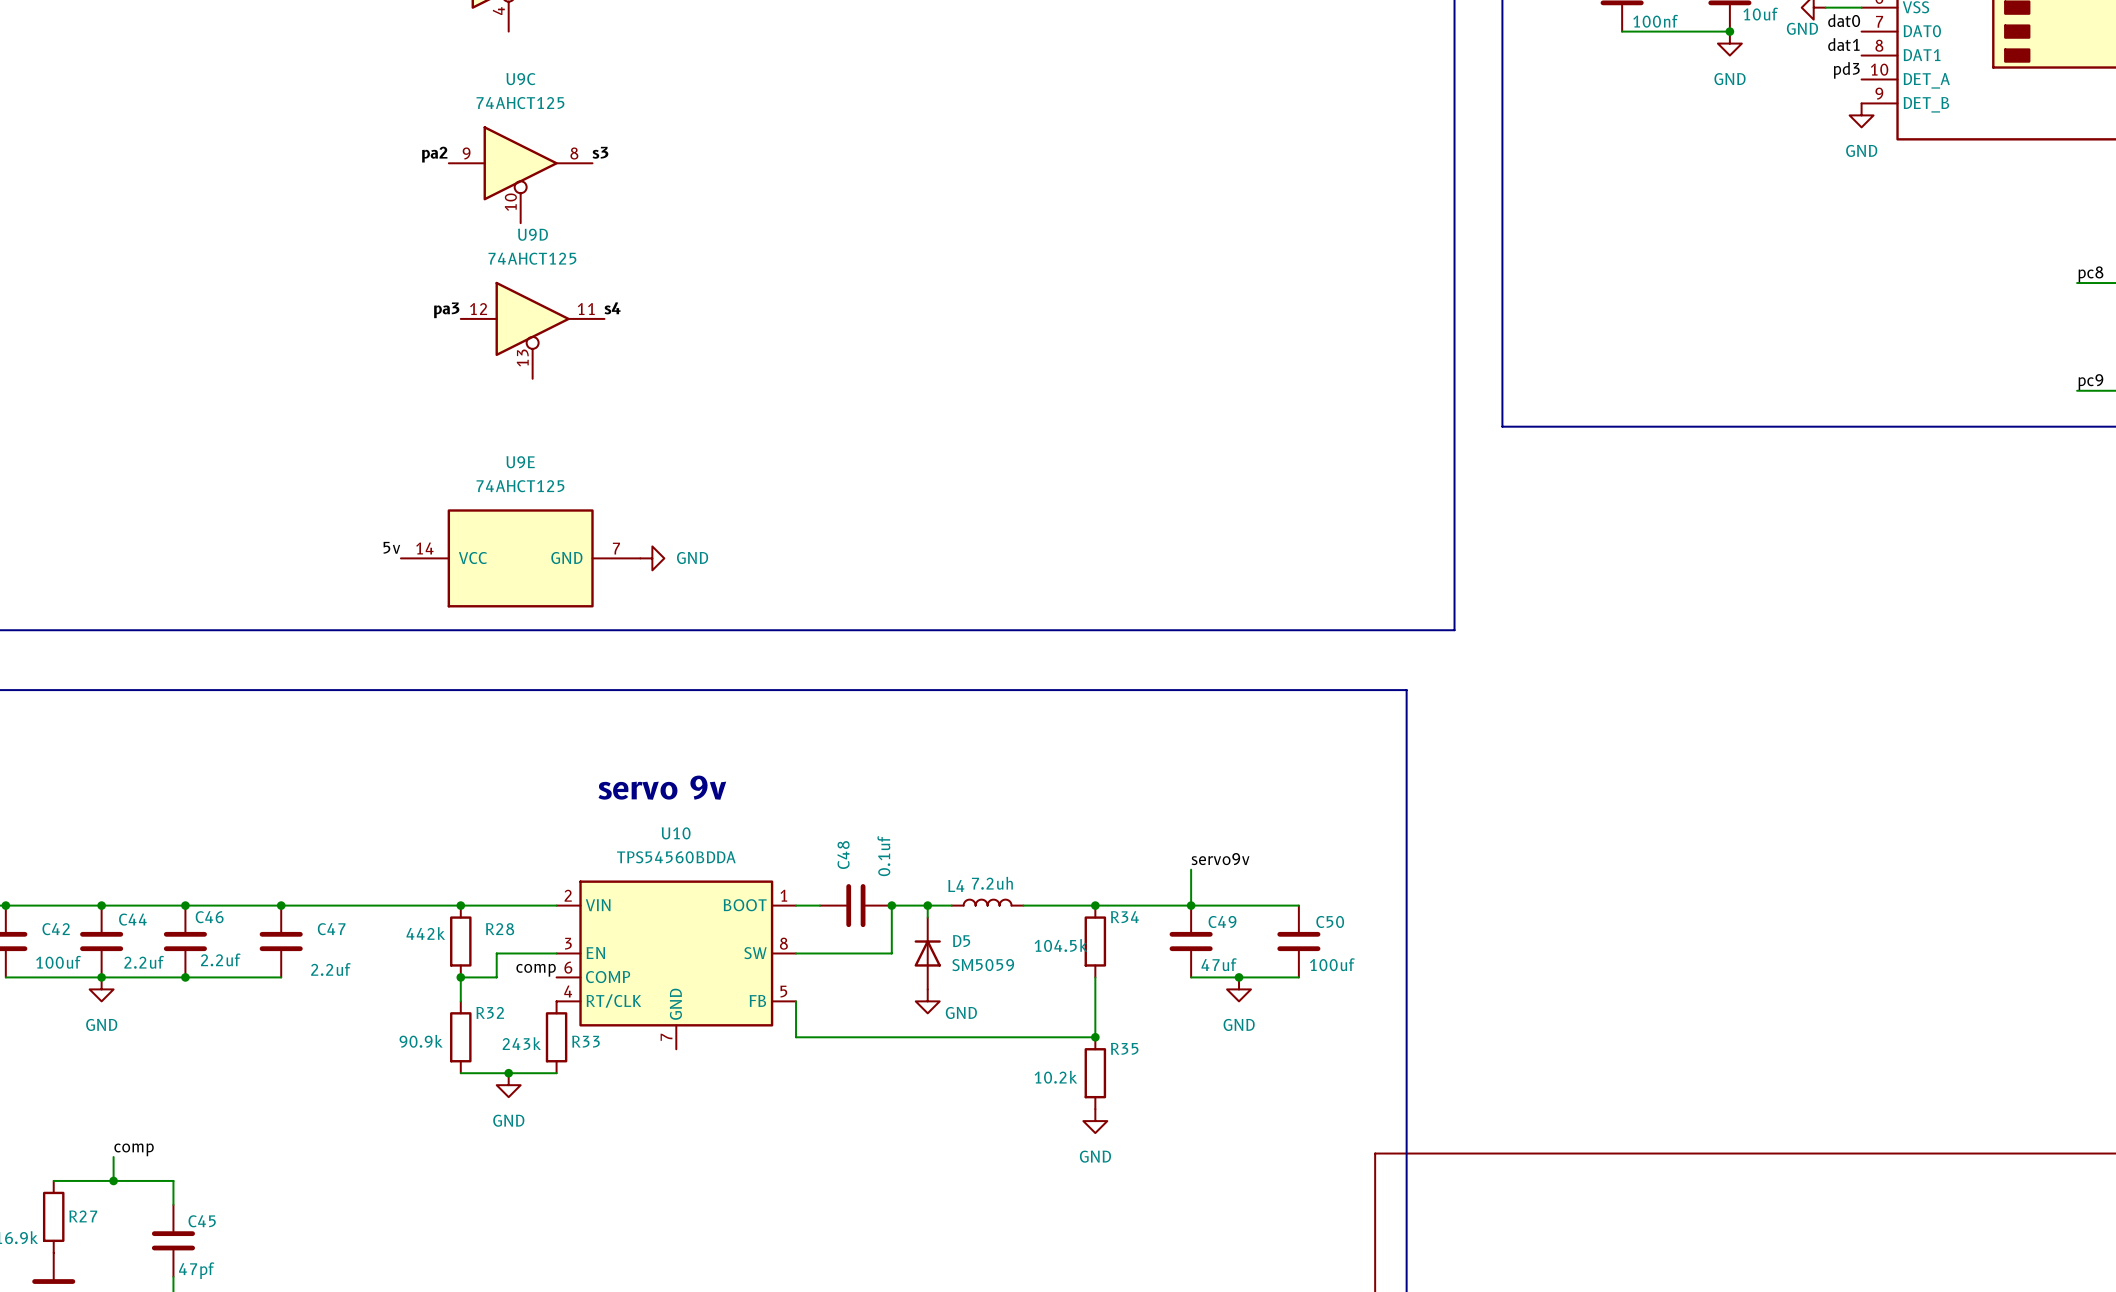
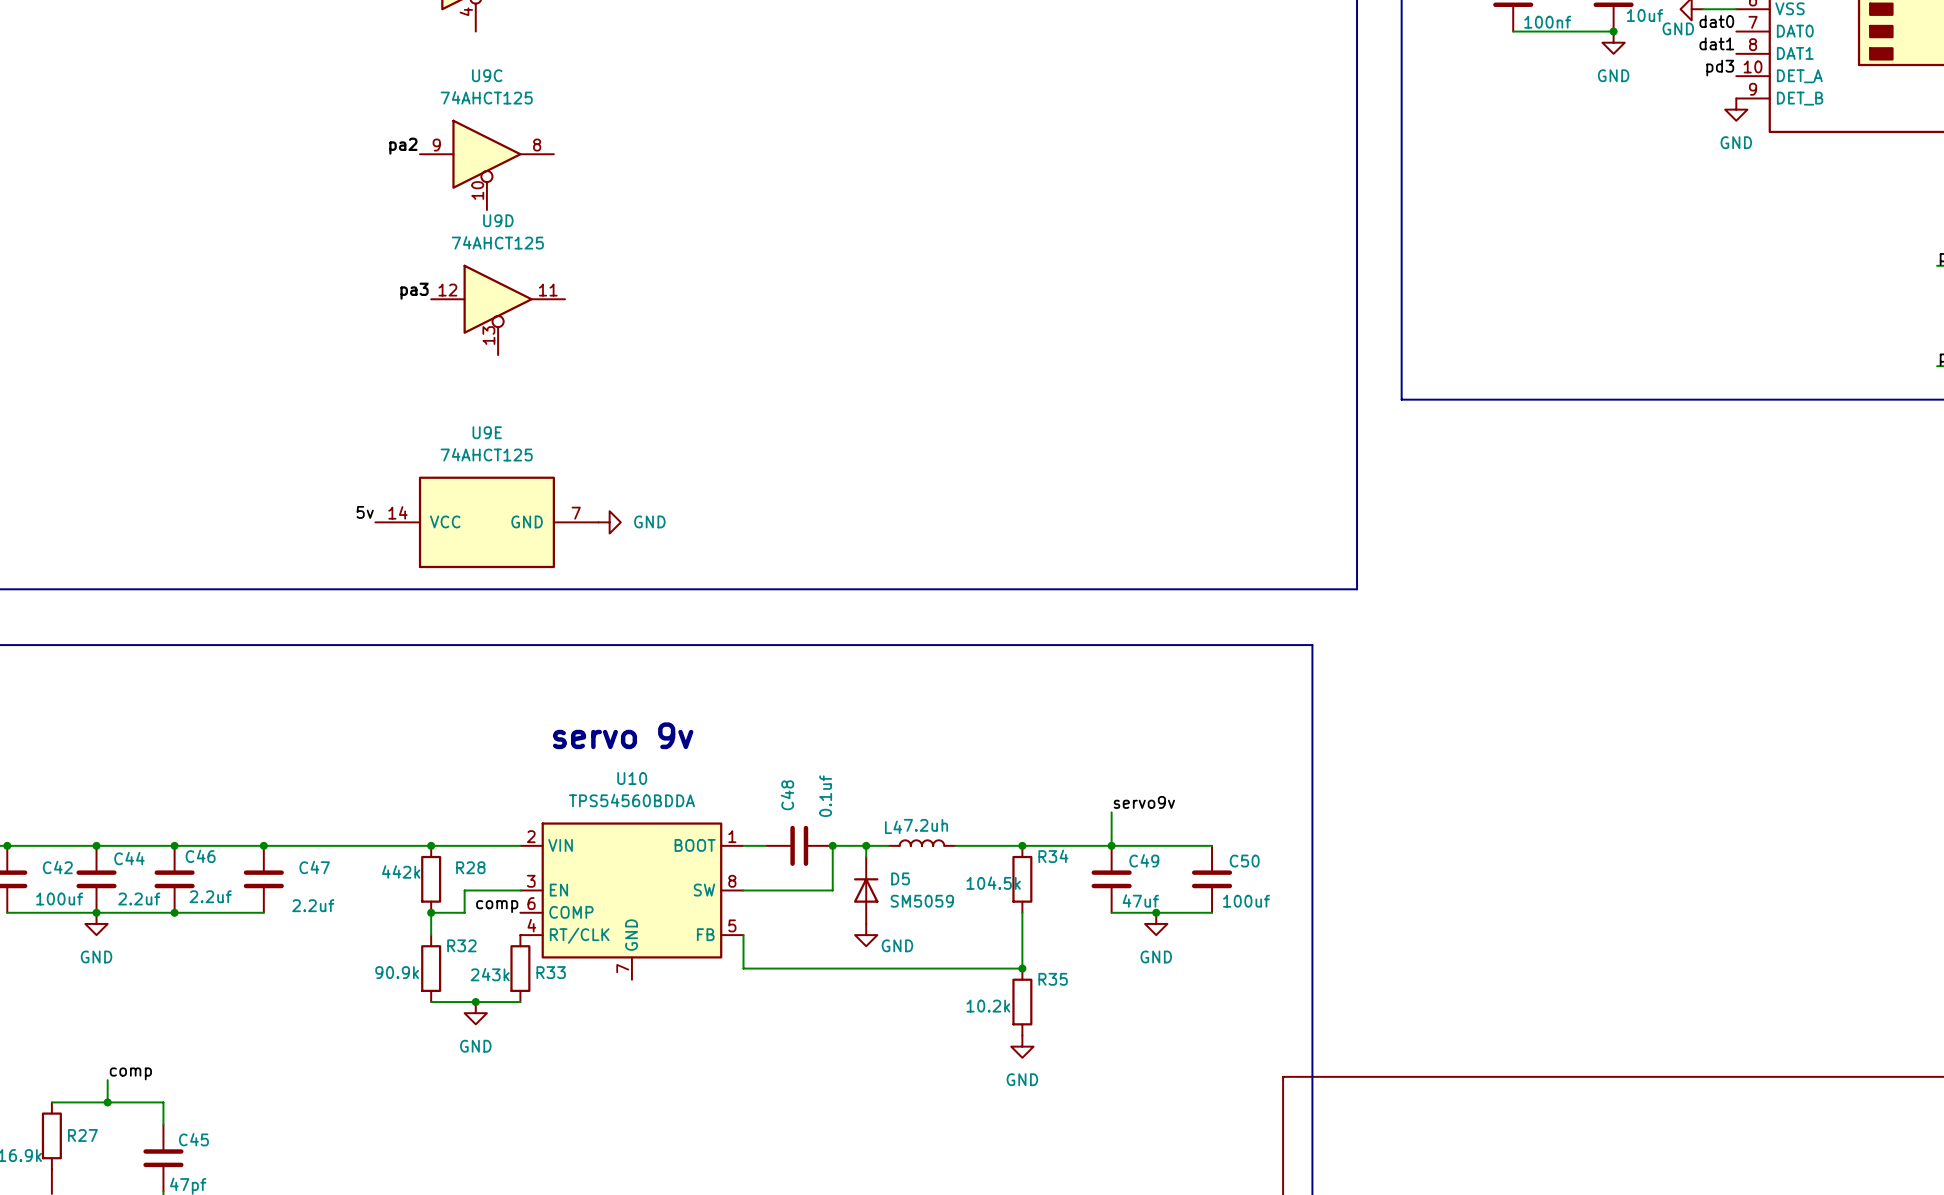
label: s3 (600, 152) -> none
label: s4 (612, 308) -> none

